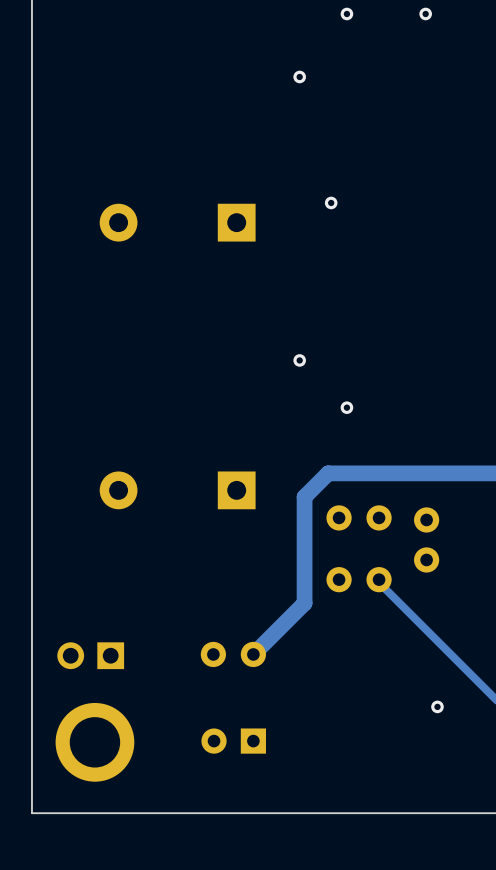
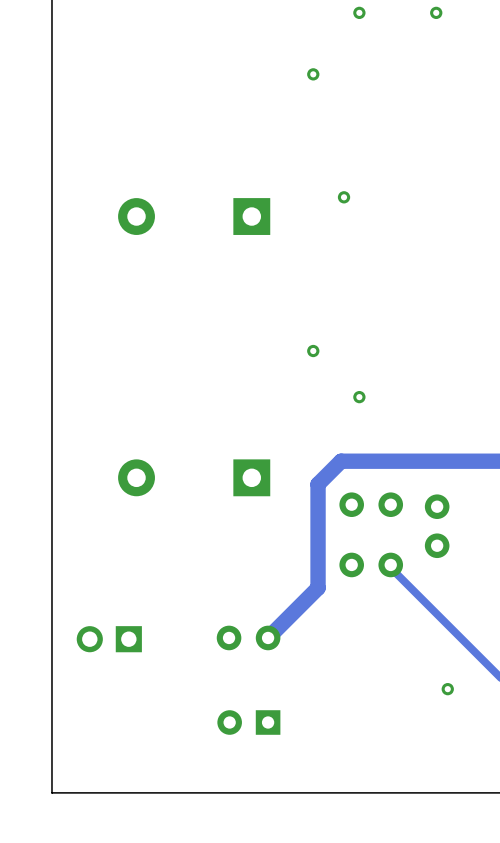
part: (94, 742) -> none

